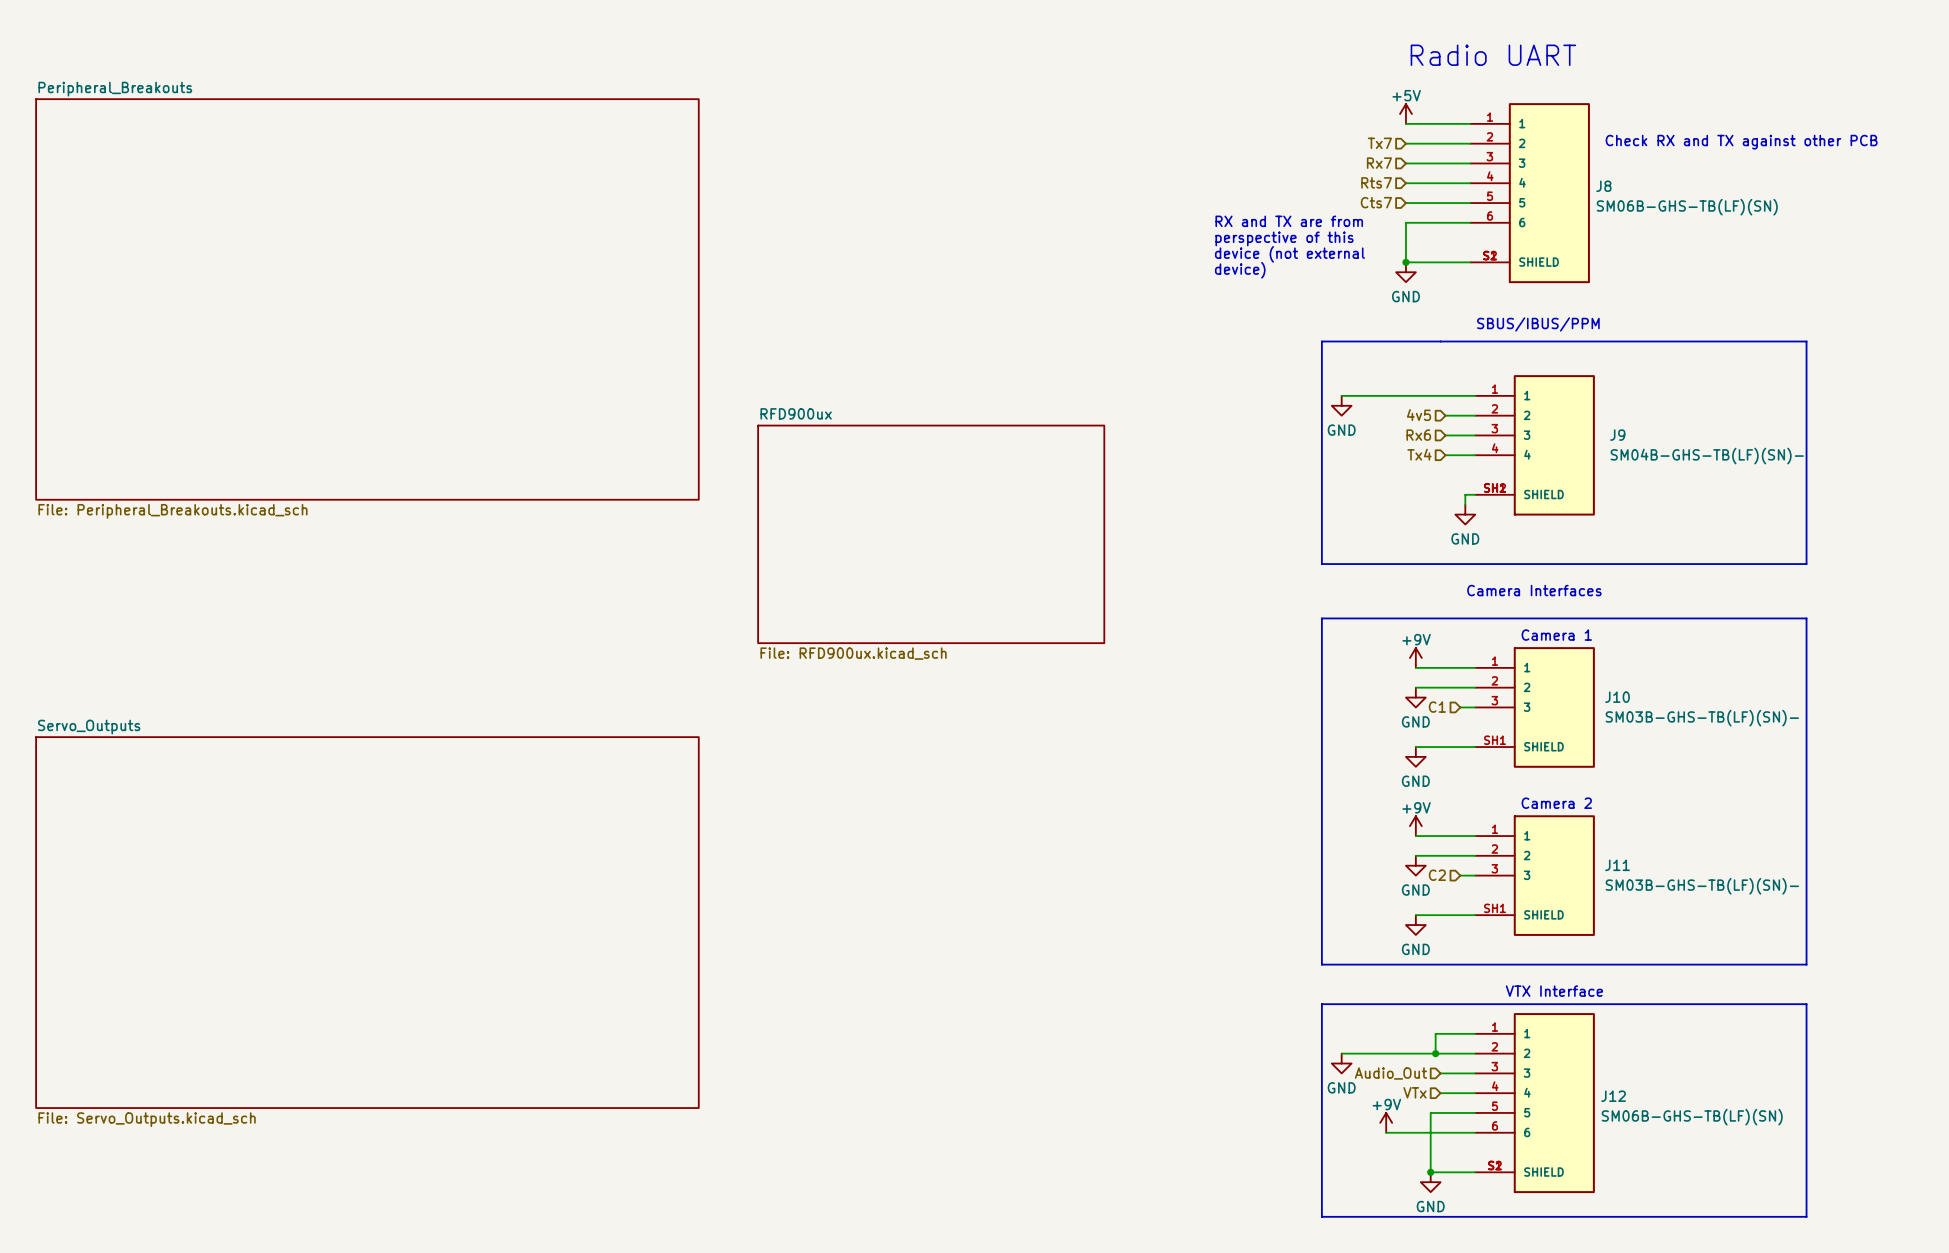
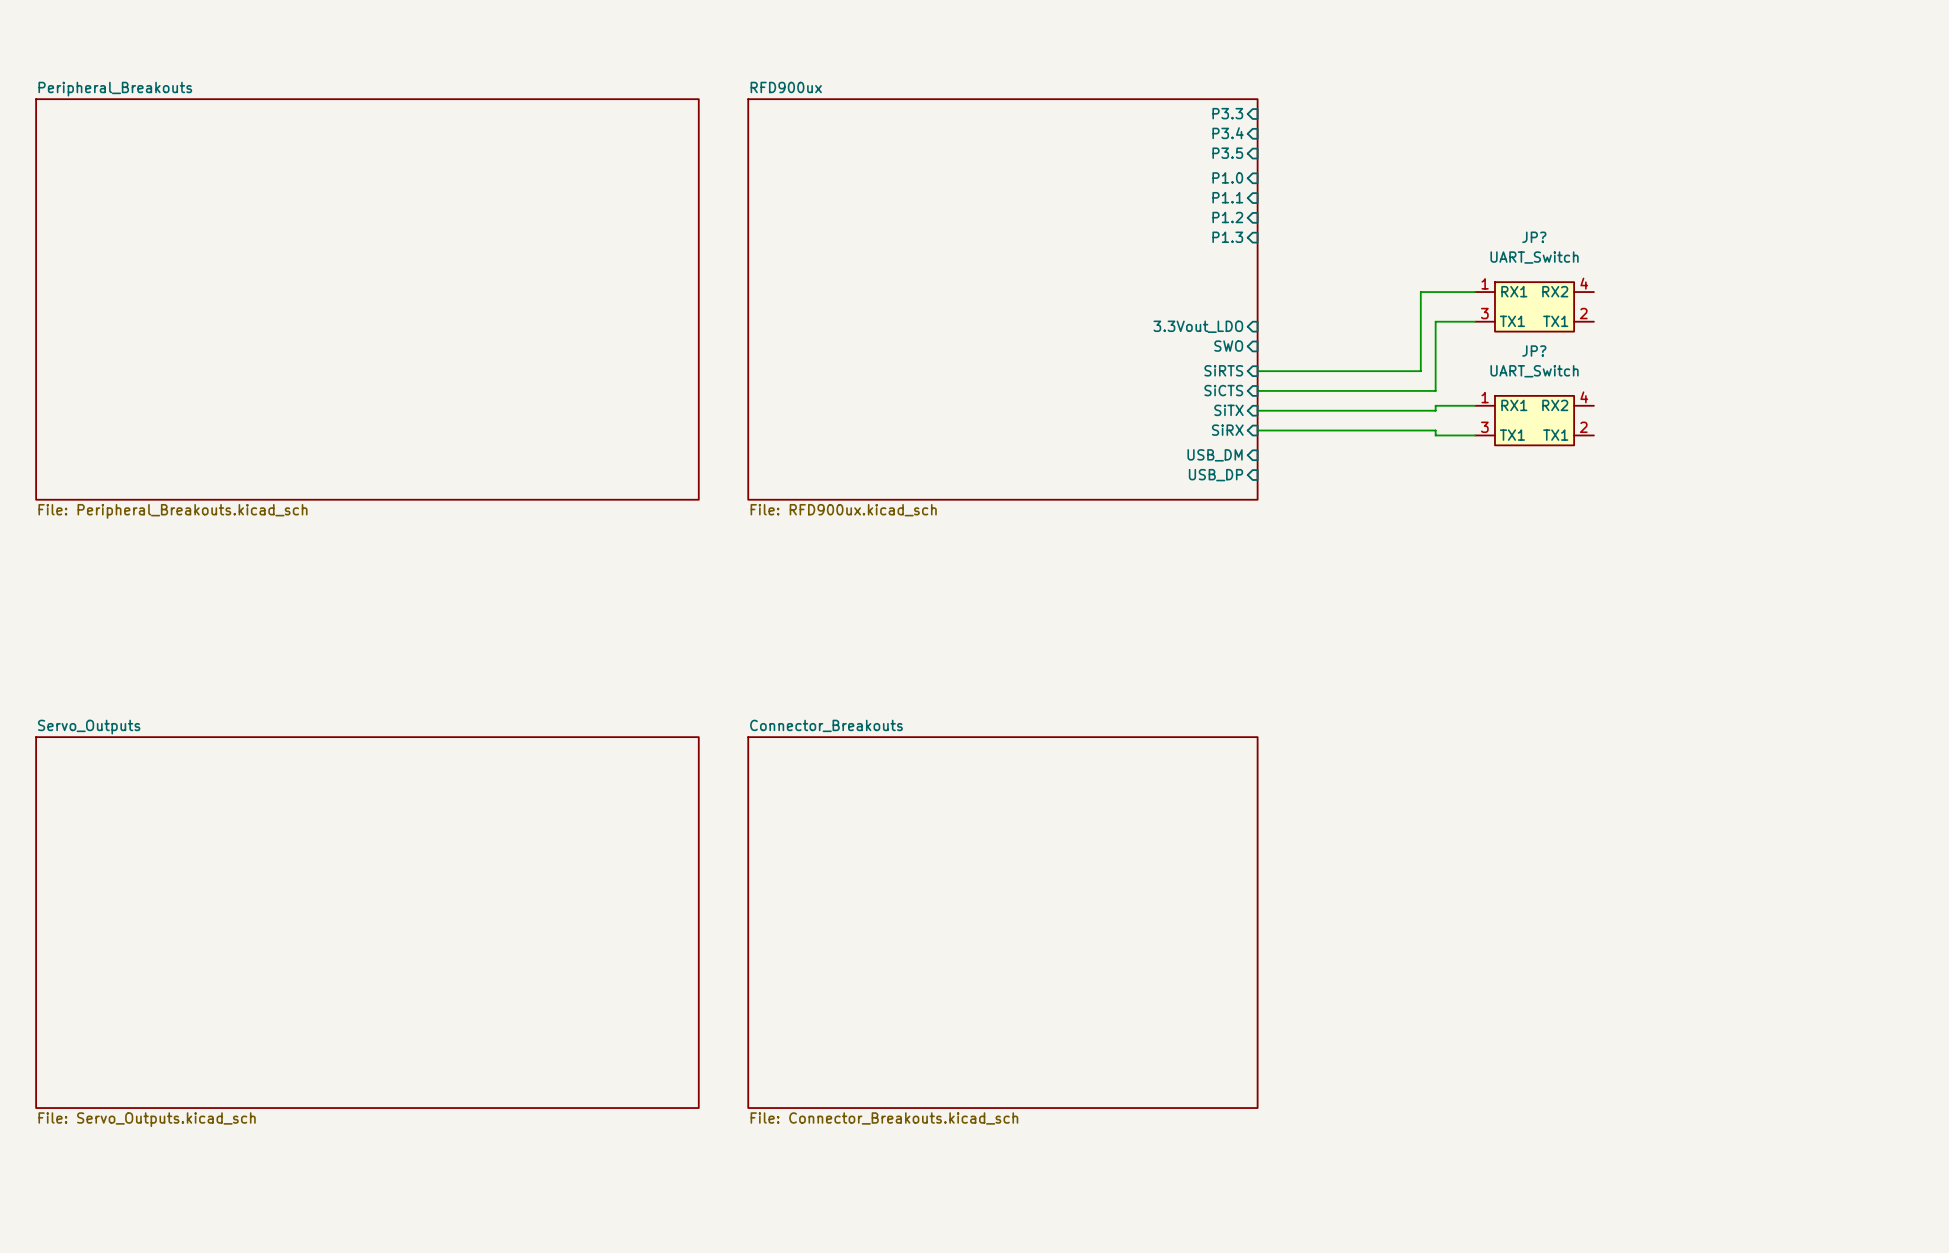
text: Radio UART (1493, 55) -> none
sheet pin: none -> P3.3 (1227, 113)
power symbol: +5V (1405, 114) -> none
wire: (1405, 123) (1470, 123) -> none
sheet pin: none -> P3.4 (1228, 133)
text: Check RX and TX against other PCB (1741, 142) -> none
hierarchical label: Tx7 (1379, 143) -> none
wire: (1405, 143) (1470, 143) -> none
sheet pin: none -> P3.5 (1227, 153)
hierarchical label: Rx7 (1379, 163) -> none
wire: (1405, 163) (1470, 163) -> none
sheet pin: none -> P1.0 (1227, 177)
hierarchical label: Rts7 (1376, 182) -> none
wire: (1405, 183) (1470, 183) -> none
J8: SM06B-GHS-TB(LF)(SN) (1530, 193) -> none
sheet pin: none -> P1.1 (1227, 197)
hierarchical label: Cts7 (1376, 202) -> none
wire: (1405, 203) (1470, 203) -> none
sheet pin: none -> P1.2 (1227, 217)
text: RX and TX are from (1289, 221) -> none
wire: (1470, 222) (1405, 222) (1405, 262) (1470, 262) -> none
sheet pin: none -> P1.3 (1227, 237)
text: perspective of this (1284, 238) -> none
text: device (not external (1289, 254) -> none
junction: (1405, 262) -> none
text: device) (1240, 270) -> none
power symbol: GND (1405, 272) -> none
wire: none -> (1475, 292) (1420, 292) (1420, 371) (1257, 371)
JP?: none -> UART_Switch (1534, 306)
wire: none -> (1475, 321) (1435, 321) (1435, 390) (1257, 390)
text: SBUS/IBUS/PPM (1538, 324) -> none
sheet pin: none -> 3.3Vout_LDO (1198, 326)
line: (1321, 341) (1321, 564) (1806, 564) (1806, 341) (1321, 341) -> none
sheet pin: none -> SWO (1228, 346)
sheet pin: none -> SiRTS (1223, 370)
sheet pin: none -> SiCTS (1223, 390)
wire: (1341, 395) (1475, 395) -> none
power symbol: GND (1341, 405) -> none
wire: none -> (1475, 405) (1435, 405) (1435, 410) (1257, 410)
sheet pin: none -> SiTX (1228, 410)
sheet RFD900ux name position: RFD900ux (796, 413) -> RFD900ux (786, 87)
hierarchical label: 4v5 (1419, 415) -> none
wire: (1445, 415) (1475, 415) -> none
JP?: none -> UART_Switch (1534, 420)
sheet RFD900ux shape: [757, 424, 1105, 644] -> [747, 98, 1259, 501]
sheet pin: none -> SiRX (1227, 430)
wire: none -> (1257, 430) (1435, 430) (1435, 435) (1445, 435)
hierarchical label: Rx6 (1418, 435) -> none
J9: SM04B-GHS-TB(LF)(SN)- (1535, 445) -> none
hierarchical label: Tx4 (1419, 454) -> none
sheet pin: none -> USB_DM (1215, 455)
wire: (1445, 455) (1475, 455) -> none
sheet pin: none -> USB_DP (1216, 475)
wire: (1475, 494) (1465, 494) (1465, 504) -> none
power symbol: GND (1465, 514) -> none
text: Camera Interfaces (1534, 590) -> none
line: (1321, 618) (1321, 964) (1806, 964) (1806, 618) (1321, 618) -> none
text: Camera 1 (1556, 635) -> none
sheet RFD900ux value position: File: RFD900ux.kicad_sch (853, 653) -> File: RFD900ux.kicad_sch (843, 510)
power symbol: +9V (1415, 658) -> none
wire: (1415, 667) (1475, 667) -> none
wire: (1415, 687) (1475, 687) -> none
power symbol: GND (1415, 697) -> none
hierarchical label: C1 (1437, 707) -> none
wire: (1460, 707) (1475, 707) -> none
J10: SM03B-GHS-TB(LF)(SN)- (1535, 707) -> none
wire: (1415, 747) (1475, 747) -> none
power symbol: GND (1415, 756) -> none
text: Camera 2 (1556, 803) -> none
power symbol: +9V (1415, 826) -> none
wire: (1415, 836) (1475, 836) -> none
wire: (1415, 855) (1475, 855) -> none
power symbol: GND (1415, 865) -> none
hierarchical label: C2 (1437, 875) -> none
wire: (1460, 875) (1475, 875) -> none
J11: SM03B-GHS-TB(LF)(SN)- (1535, 875) -> none
wire: (1415, 915) (1475, 915) -> none
sheet Connector_Breakouts: none -> File: Connector_Breakouts.kicad_sch (1002, 922)
power symbol: GND (1415, 925) -> none
text: VTX Interface (1554, 991) -> none
line: (1321, 1004) (1321, 1216) (1806, 1216) (1806, 1004) (1321, 1004) -> none
wire: (1475, 1033) (1435, 1033) (1435, 1053) -> none
wire: (1341, 1053) (1475, 1053) -> none
junction: (1435, 1053) -> none
power symbol: GND (1341, 1063) -> none
hierarchical label: Audio_Out (1390, 1073) -> none
wire: (1440, 1073) (1475, 1073) -> none
hierarchical label: VTx (1415, 1092) -> none
wire: (1440, 1093) (1475, 1093) -> none
J12: SM06B-GHS-TB(LF)(SN) (1535, 1103) -> none
wire: (1475, 1112) (1430, 1112) (1430, 1172) (1475, 1172) -> none
power symbol: +9V (1386, 1122) -> none
wire: (1386, 1132) (1475, 1132) -> none
junction: (1430, 1172) -> none
power symbol: GND (1430, 1182) -> none

